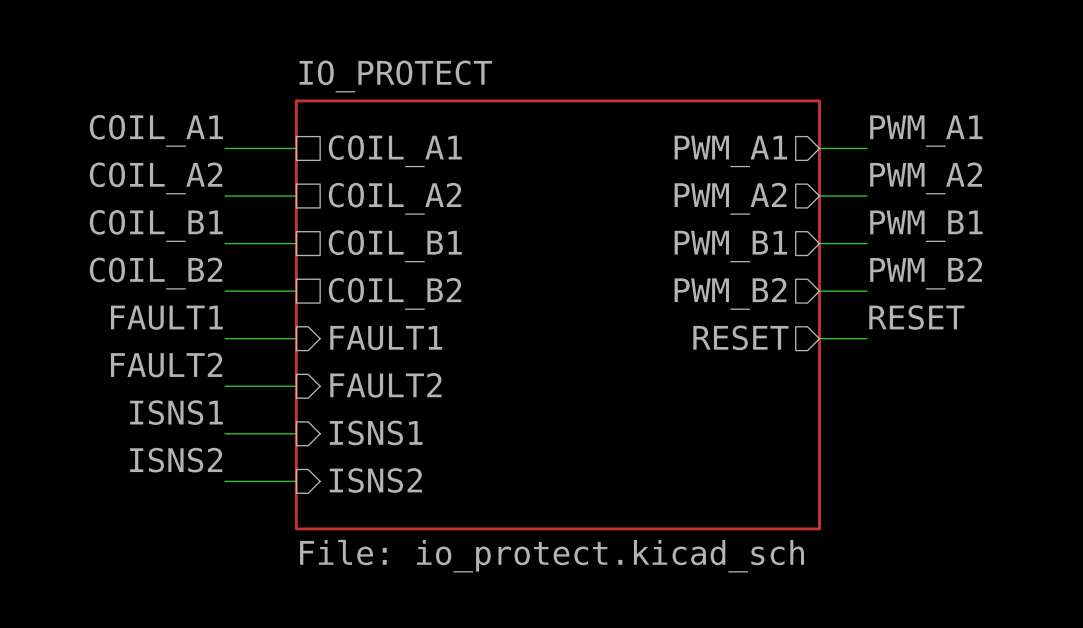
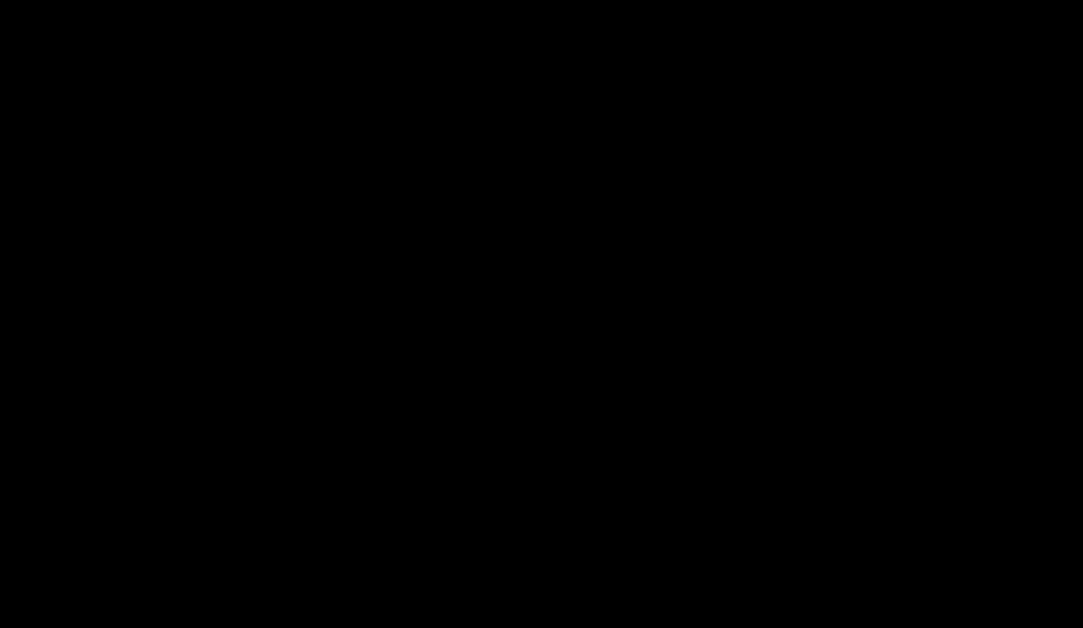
label: COIL_A1 (156, 130) -> none
label: PWM_A1 (926, 131) -> none
wire: (225, 148) (296, 148) -> none
wire: (819, 148) (867, 148) -> none
sheet pin: COIL_A1 (395, 151) -> none
sheet pin: PWM_A1 (730, 151) -> none
label: COIL_A2 (156, 178) -> none
label: PWM_A2 (926, 178) -> none
wire: (225, 196) (296, 196) -> none
wire: (819, 196) (867, 196) -> none
sheet pin: COIL_A2 (395, 198) -> none
sheet pin: PWM_A2 (730, 198) -> none
label: COIL_B1 (156, 226) -> none
label: PWM_B1 (926, 226) -> none
wire: (225, 243) (296, 243) -> none
wire: (819, 243) (867, 243) -> none
sheet pin: COIL_B1 (395, 246) -> none
sheet pin: PWM_B1 (730, 246) -> none
label: COIL_B2 (156, 273) -> none
label: PWM_B2 (926, 273) -> none
wire: (225, 291) (296, 291) -> none
wire: (819, 291) (867, 291) -> none
sheet pin: COIL_B2 (395, 293) -> none
sheet pin: PWM_B2 (730, 293) -> none
sheet IO_PROTECT: File: io_protect.kicad_sch (557, 314) -> none
label: FAULT1 (166, 317) -> none
label: RESET (916, 317) -> none
sheet pin: RESET (740, 337) -> none
wire: (225, 338) (296, 338) -> none
sheet pin: FAULT1 (386, 338) -> none
wire: (819, 338) (867, 338) -> none
label: FAULT2 (166, 365) -> none
sheet pin: FAULT2 (385, 385) -> none
wire: (225, 386) (296, 386) -> none
label: ISNS1 (176, 412) -> none
sheet pin: ISNS1 (376, 432) -> none
wire: (225, 433) (296, 433) -> none
label: ISNS2 (176, 460) -> none
sheet pin: ISNS2 (375, 480) -> none
wire: (225, 481) (296, 481) -> none

